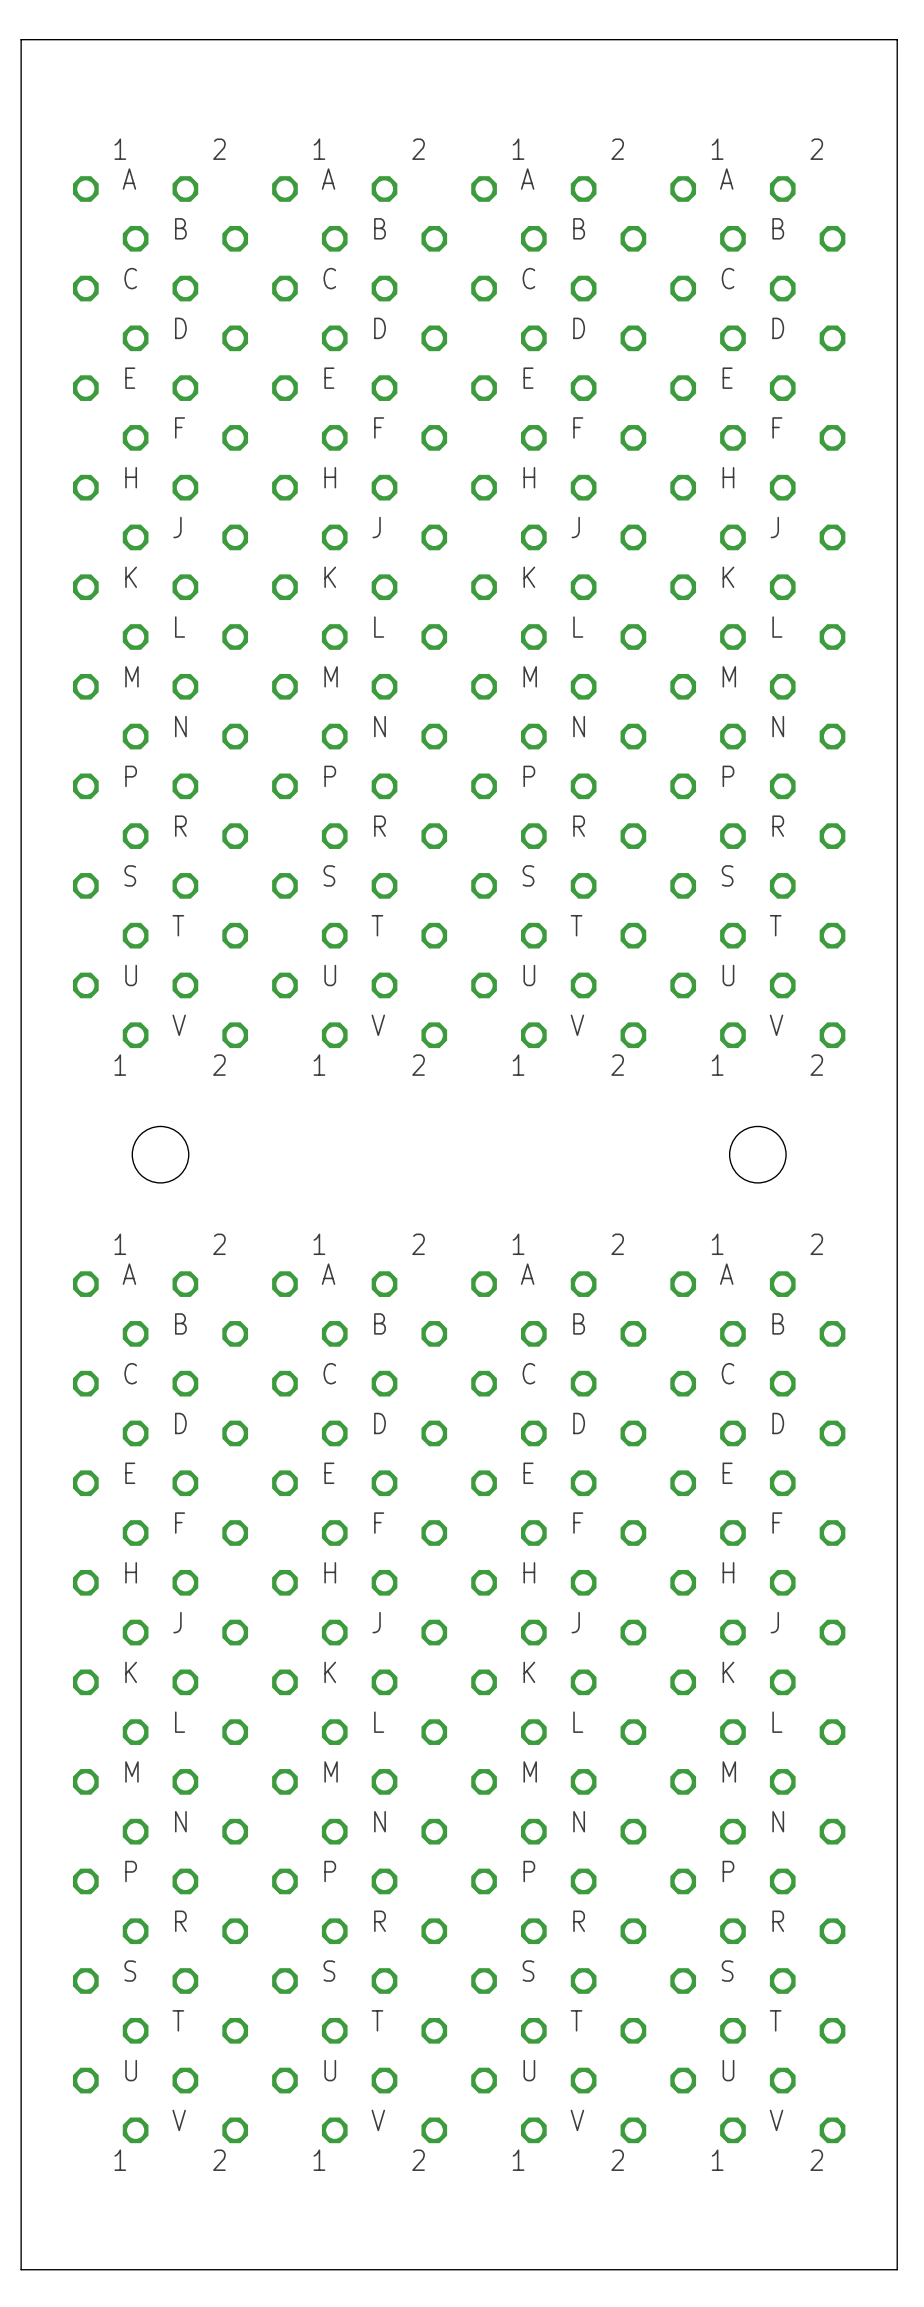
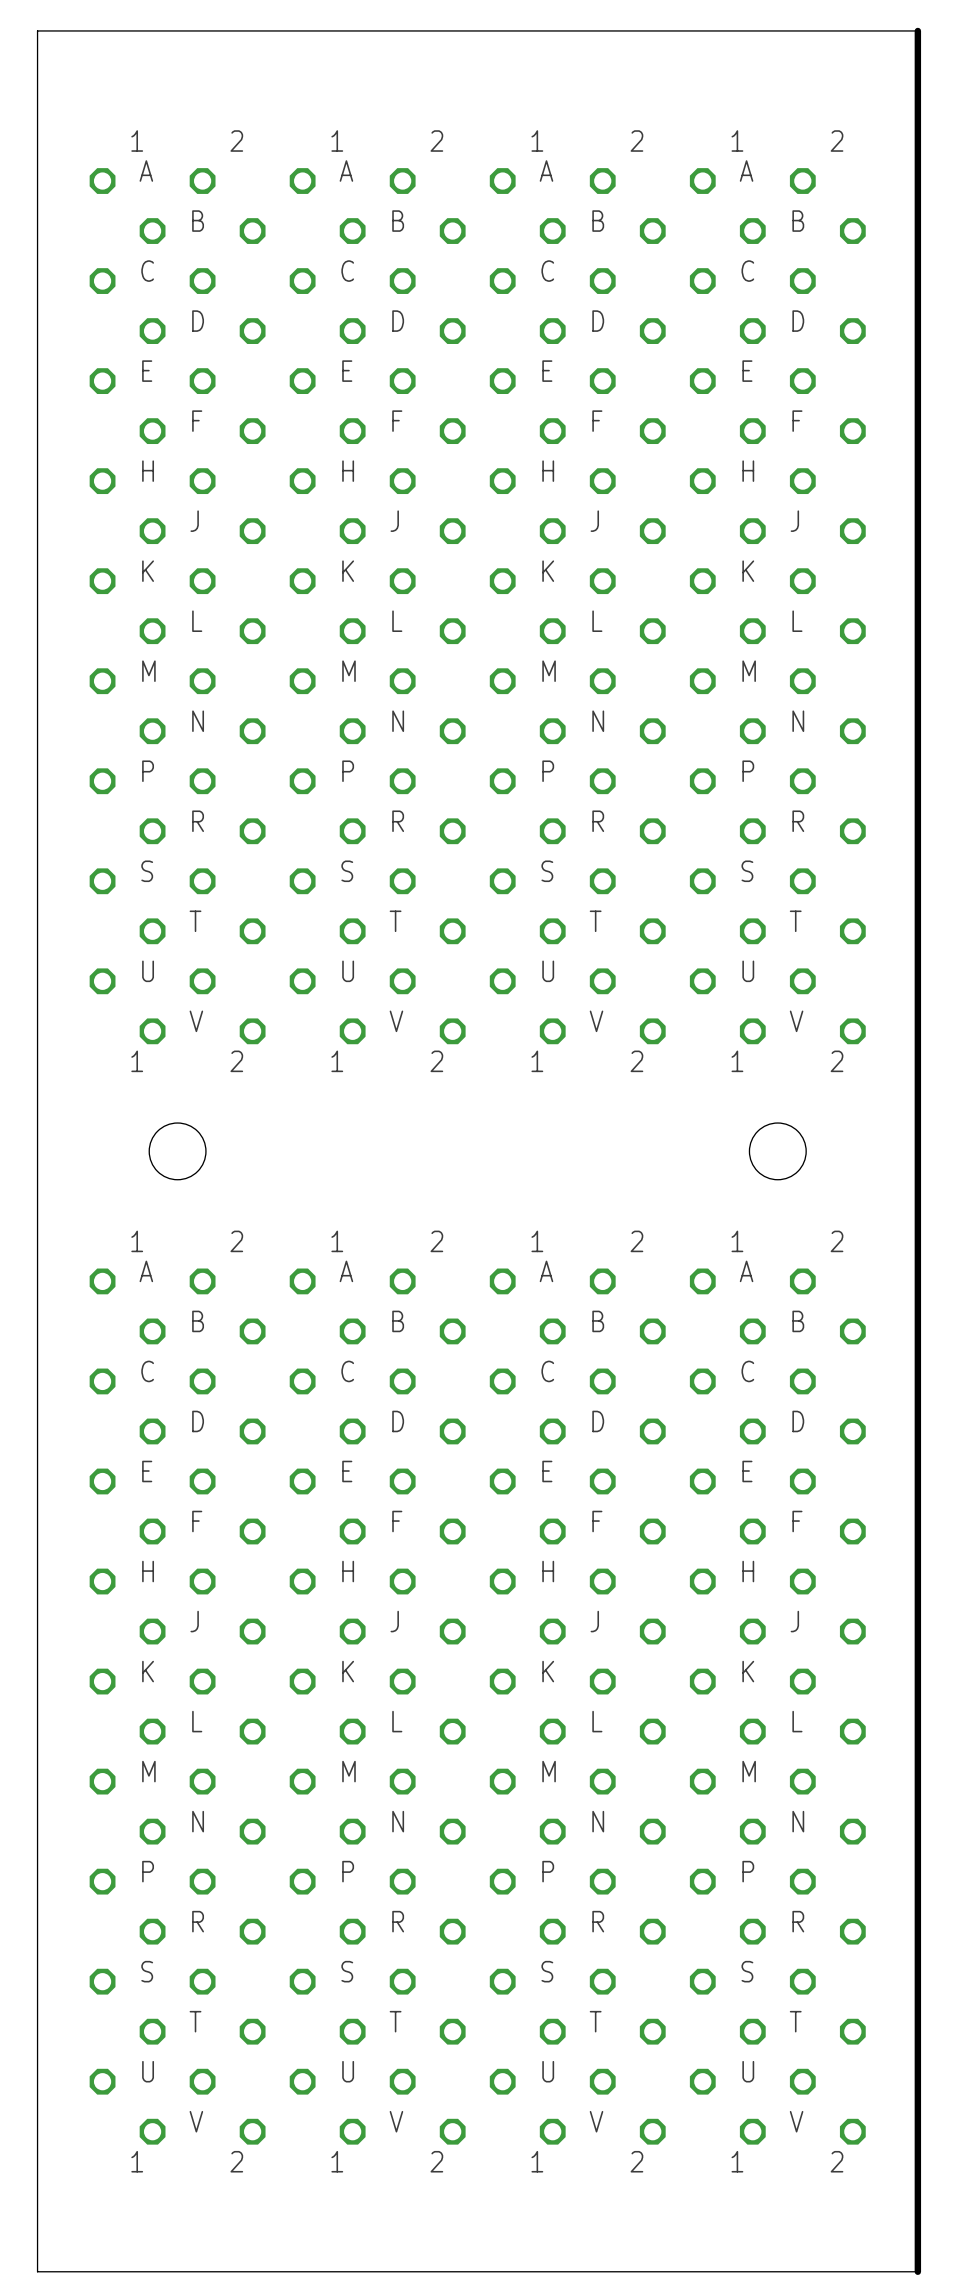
board edge width: thin (897, 39) (897, 2269) -> thick (917, 30) (917, 2271)

